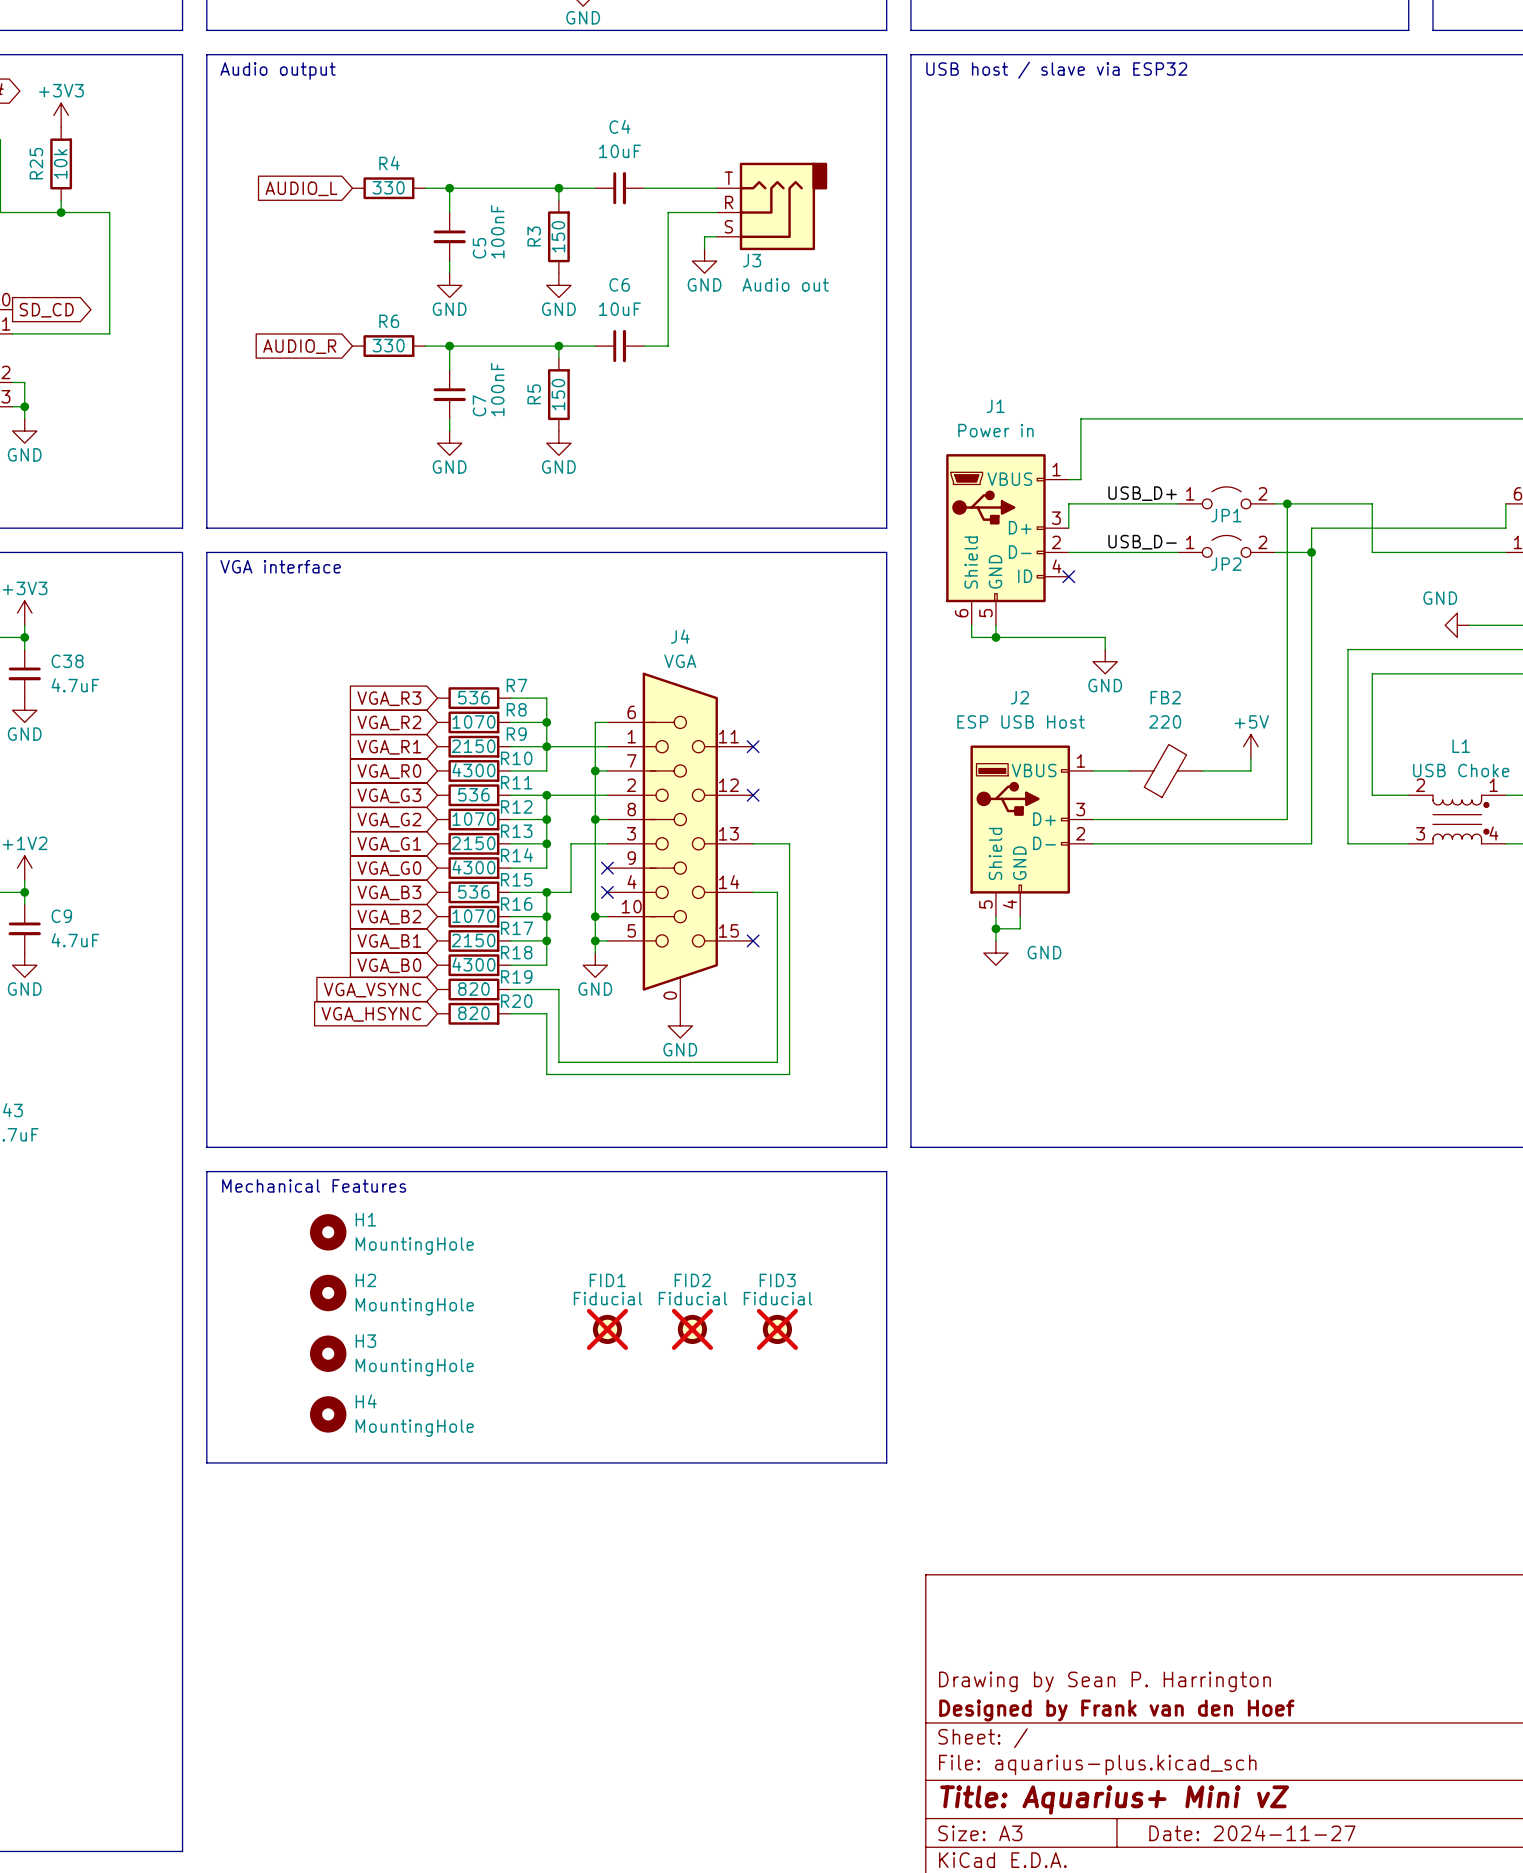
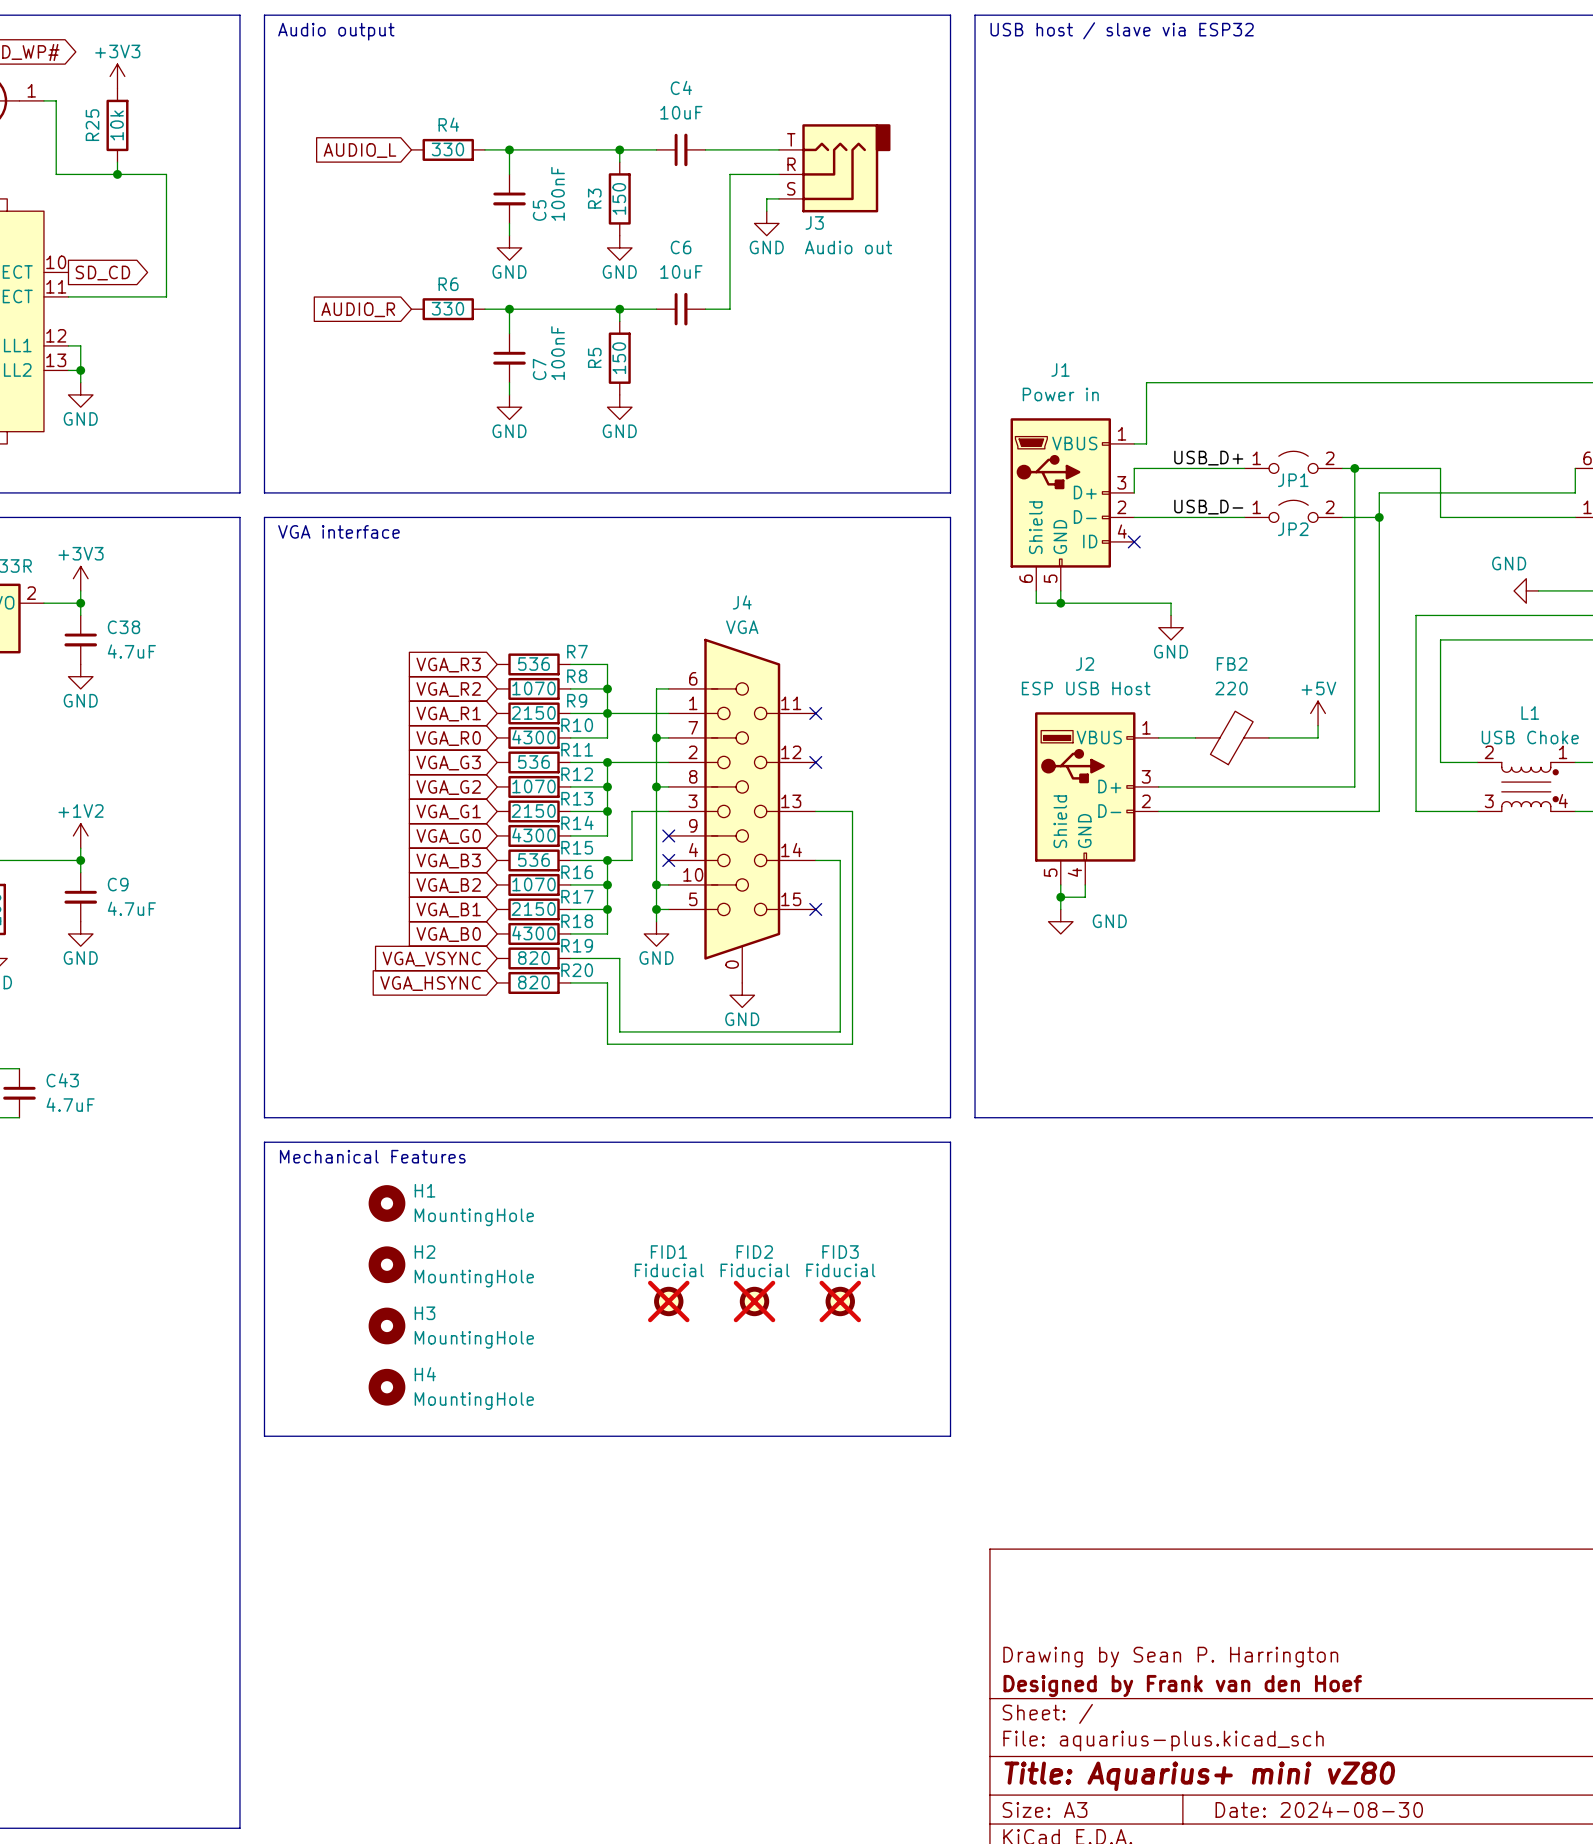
title block: Title: Aquarius+ Mini vZ (1114, 1800) -> Title: Aquarius+ mini vZ80 (1199, 1776)
title block: Date: 2024-11-27 (1252, 1832) -> Date: 2024-08-30 (1319, 1809)

